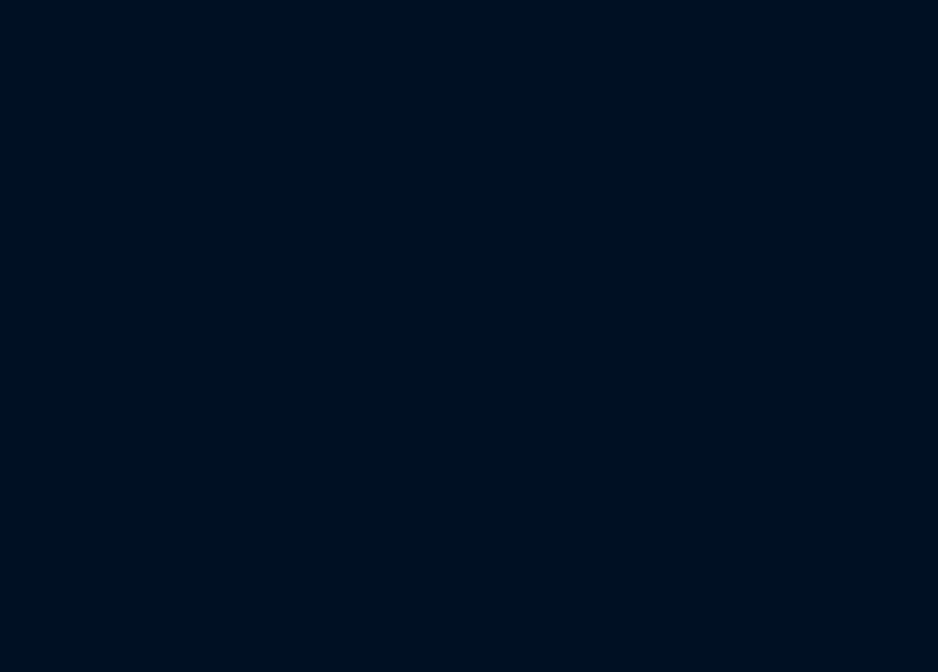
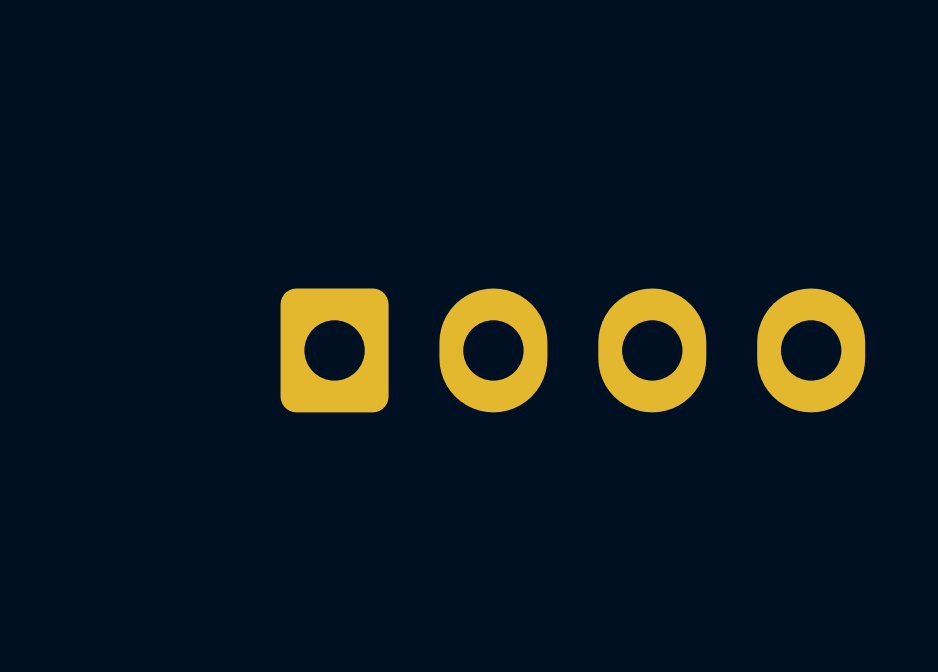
part: none -> (572, 350)

